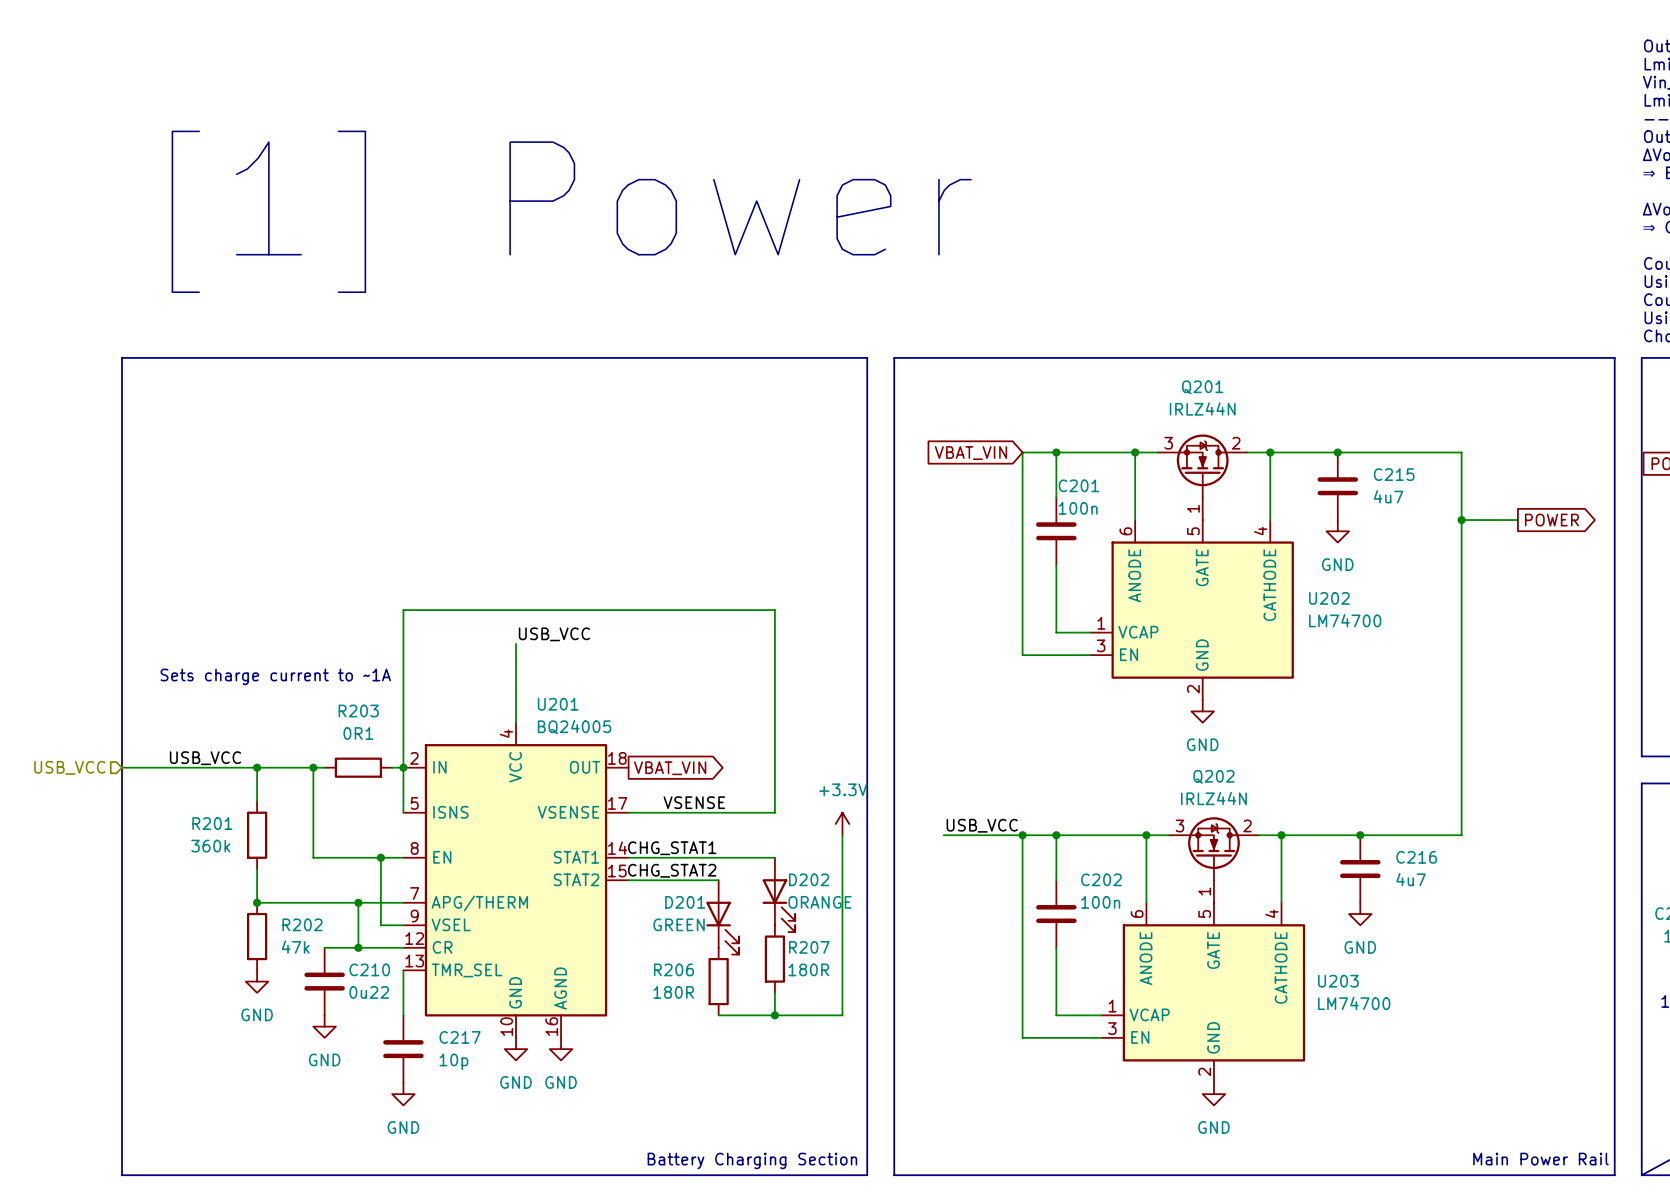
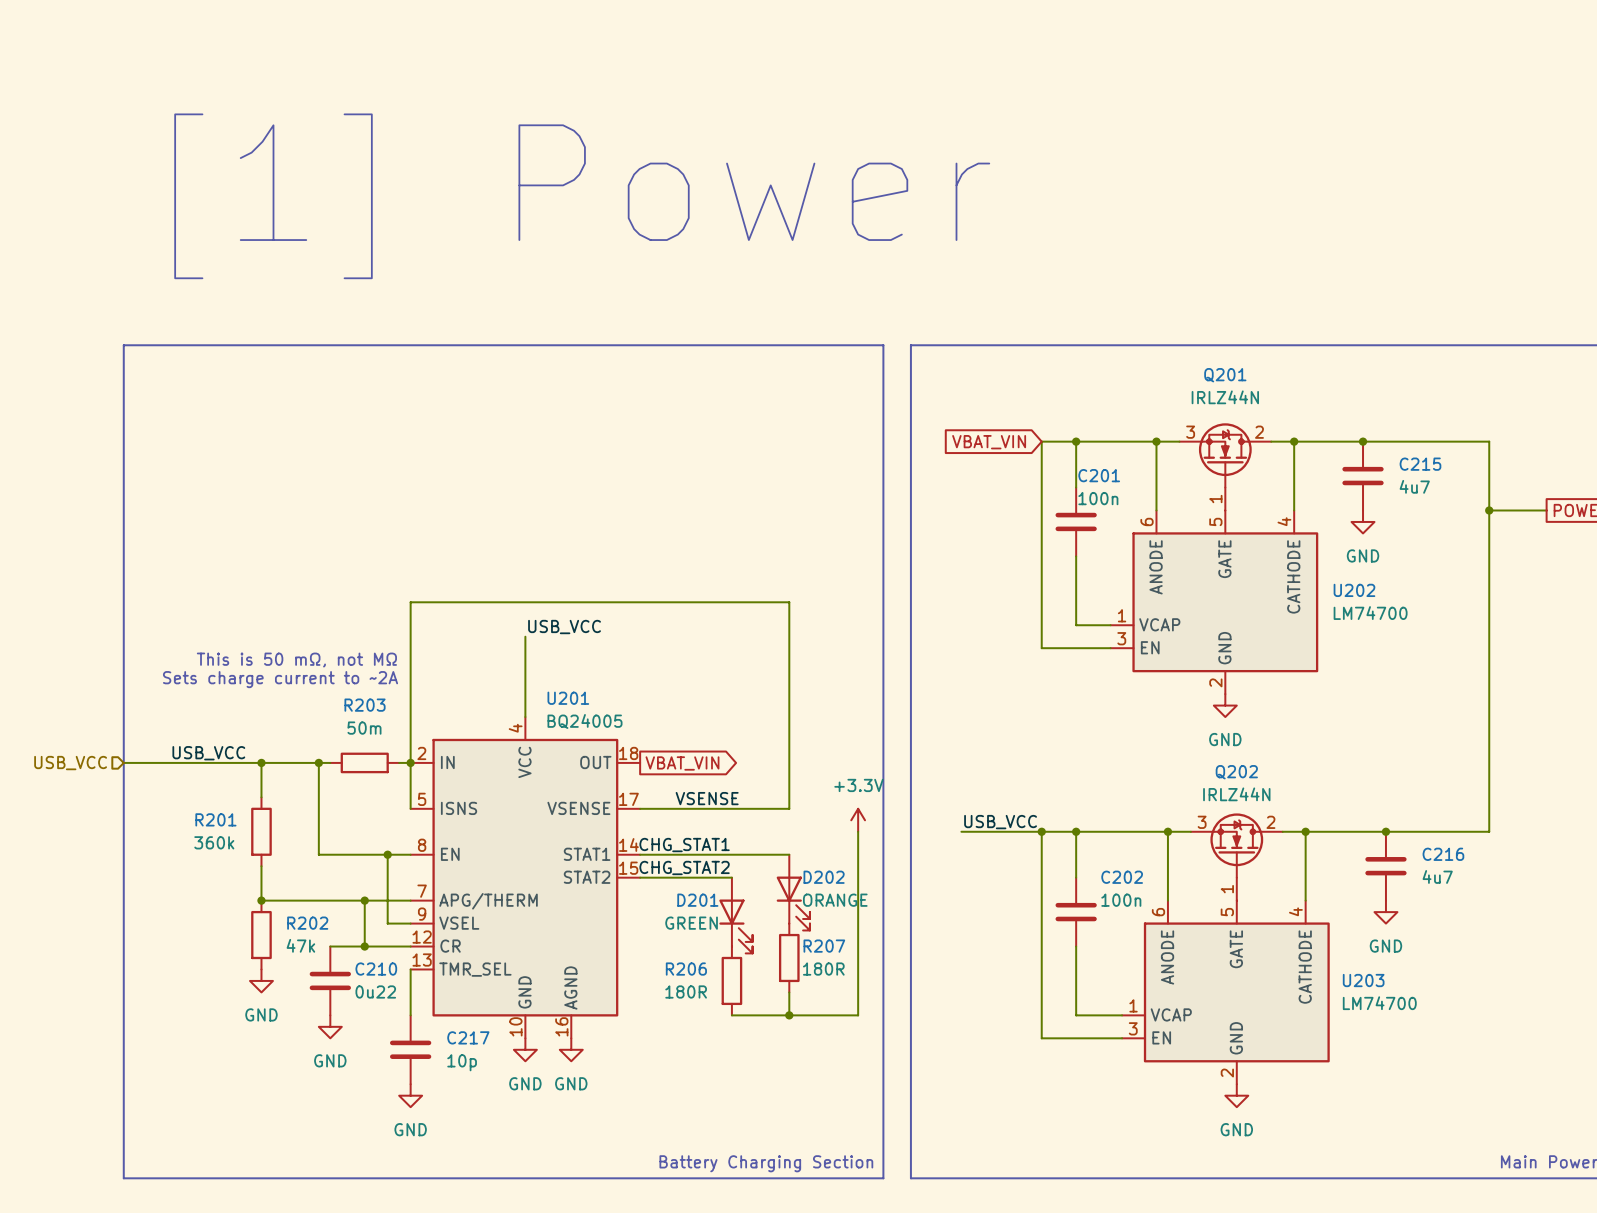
text: none -> This is 50 mΩ, not MΩ (296, 660)
text: Sets charge current to ~1A (275, 676) -> Sets charge current to ~2A (280, 679)
R203 value: 0R1 (358, 733) -> 50m (364, 728)

